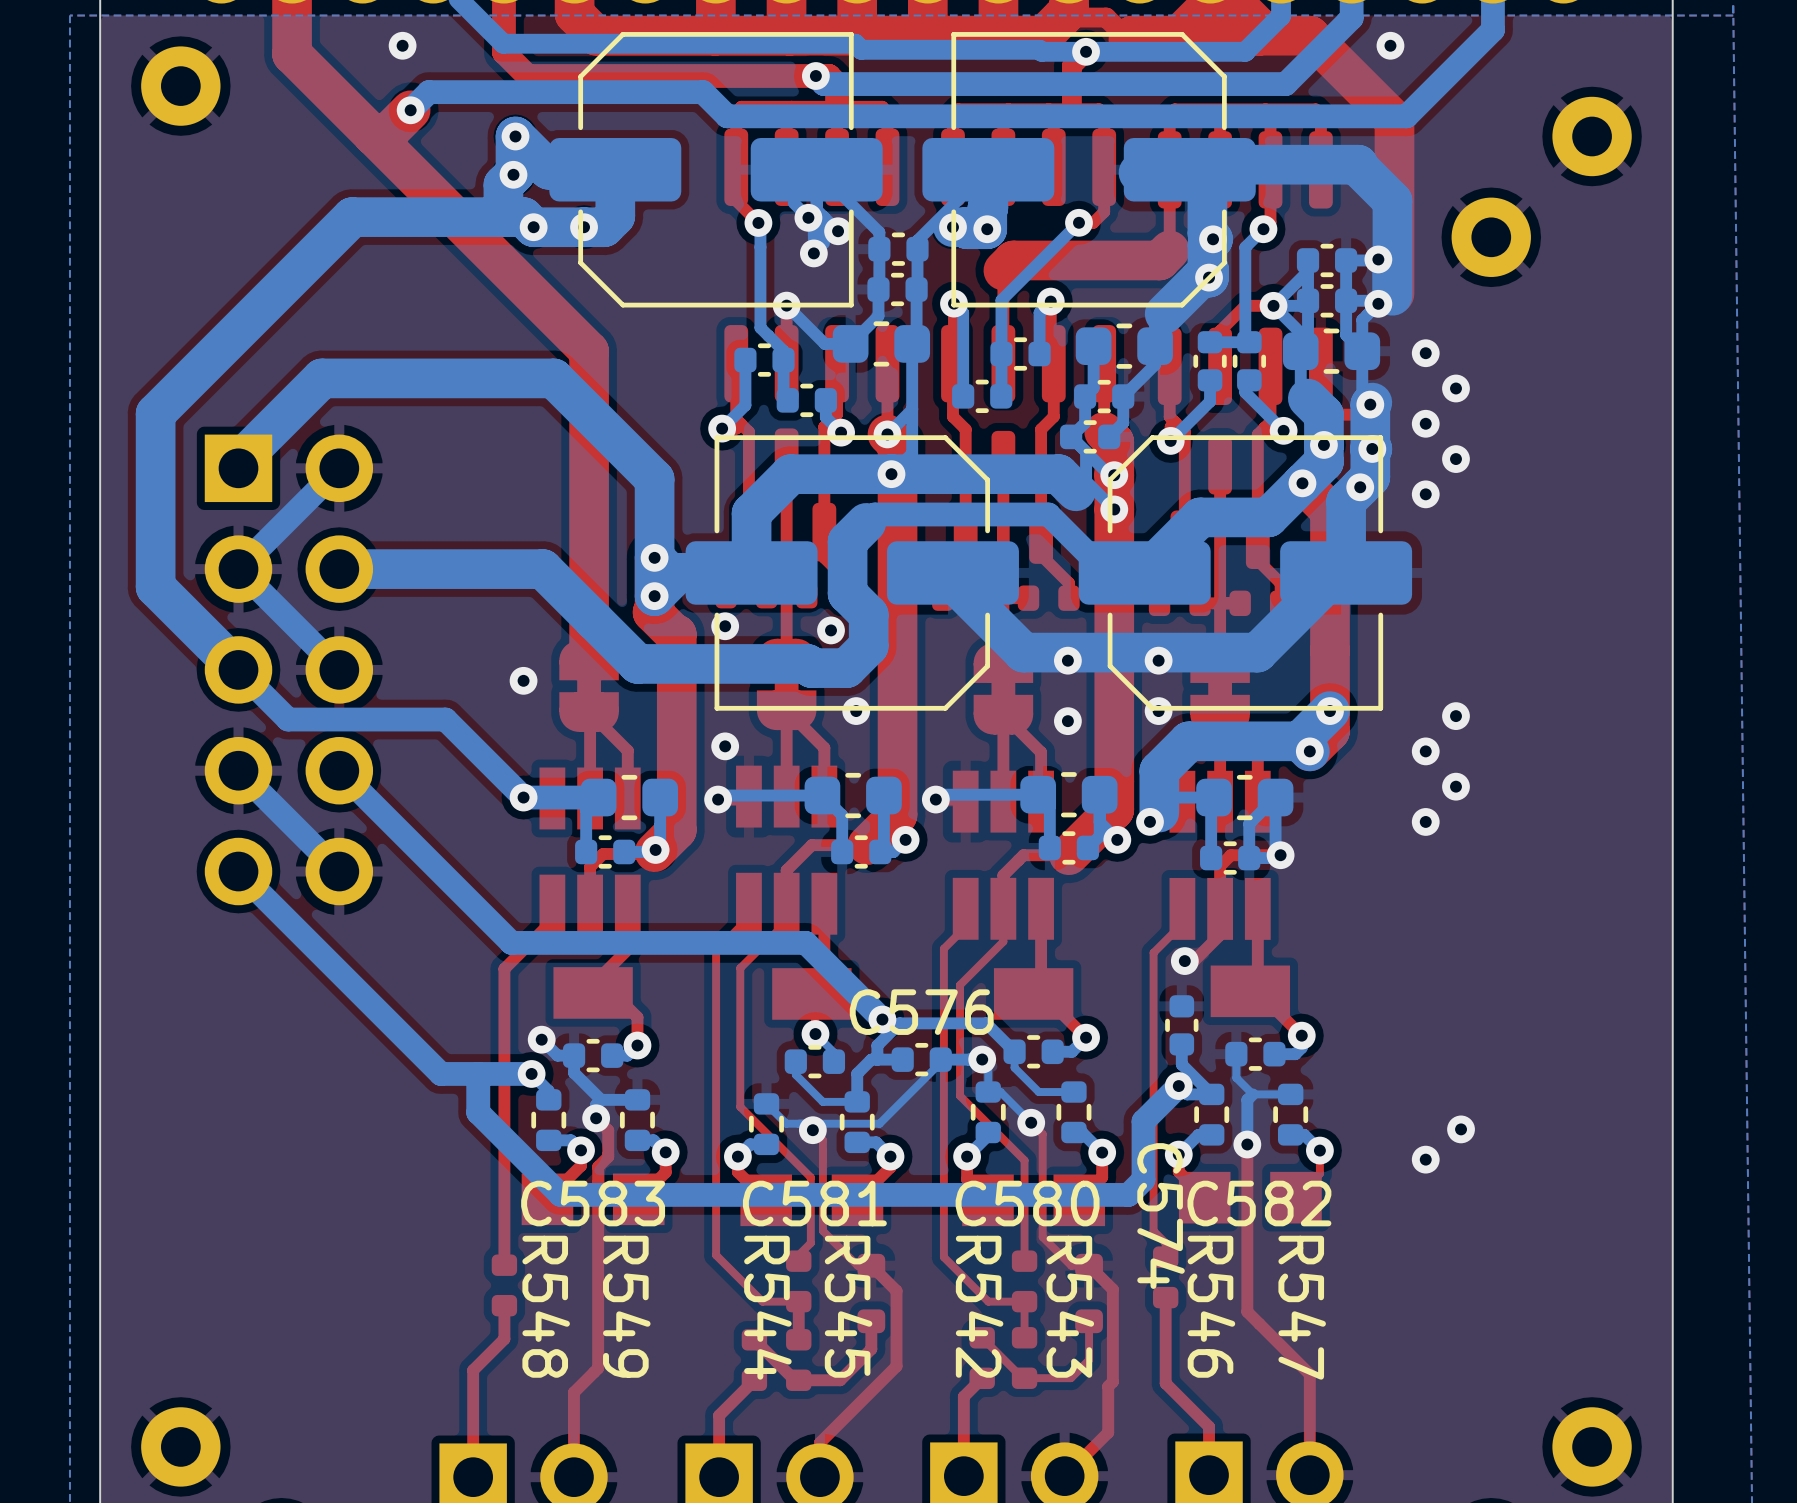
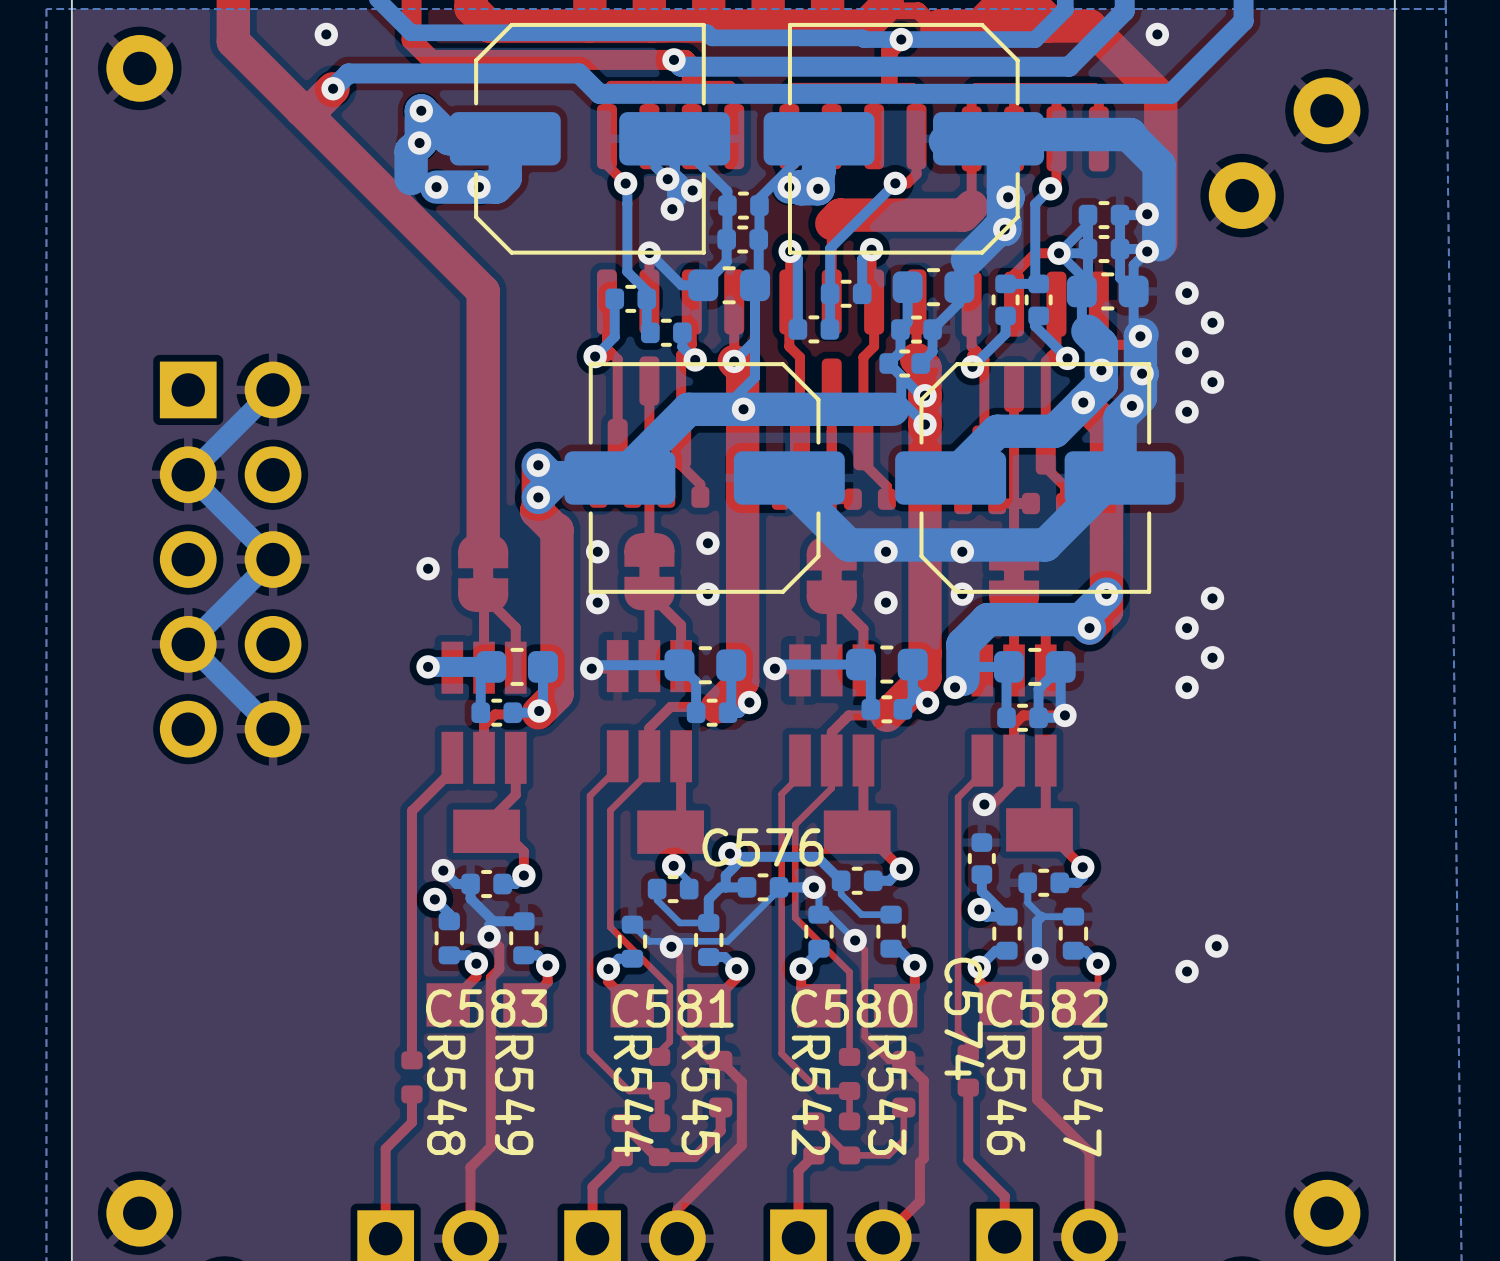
bottom track: (533, 227) (523, 217) (352, 217) (155, 413) (155, 587) (288, 719) (445, 719) (523, 797) -> none
bottom track: (238, 468) (238, 461) (321, 378) (553, 378) (654, 479) (654, 596) -> none
via position: (891, 474) -> (743, 409)
bottom track: (1075, 491) (1058, 474) (790, 474) (751, 513) (751, 572) -> (892, 409) (688, 409) (619, 477)
bottom track: (339, 569) (542, 569) (637, 663) (807, 663) (811, 668) (846, 668) (868, 646) (868, 614) (847, 593) (847, 541) (874, 514) (1048, 514) (1107, 572) (1144, 572) -> none
via position: (725, 626) -> (597, 551)
via position: (831, 630) -> (707, 543)
bottom track: none -> (273, 559) (188, 644)
via position: (725, 746) -> (597, 602)
bottom track: (339, 770) (511, 942) (805, 942) (882, 1019) -> none
bottom track: (238, 871) (440, 1073) (531, 1073) -> none
bottom track: (478, 1073) (478, 1112) (560, 1194) (1128, 1194) (1143, 1179) (1143, 1121) (1178, 1086) -> none

